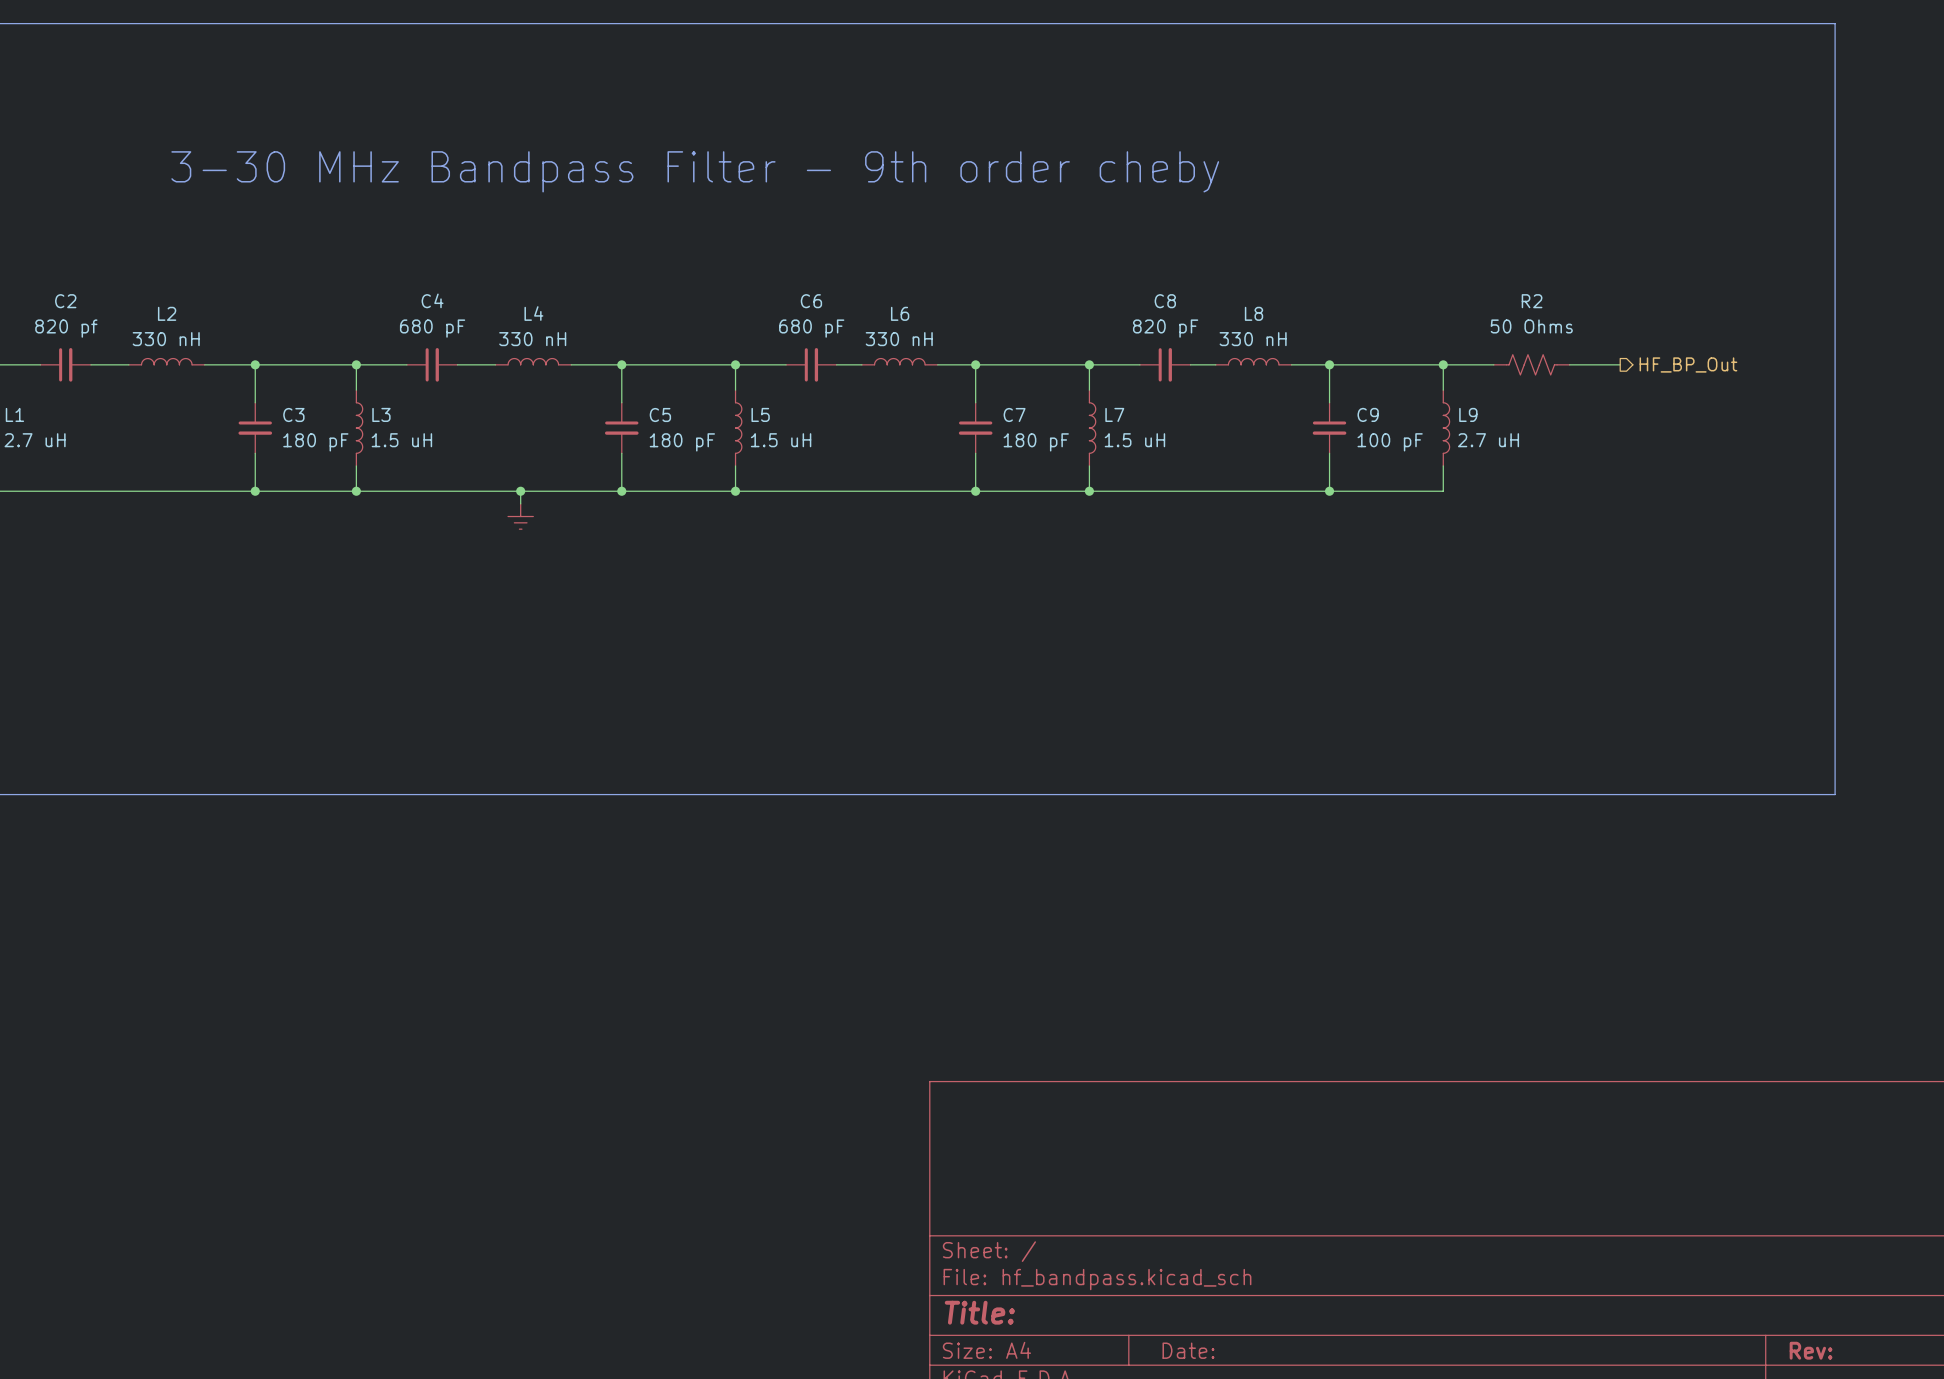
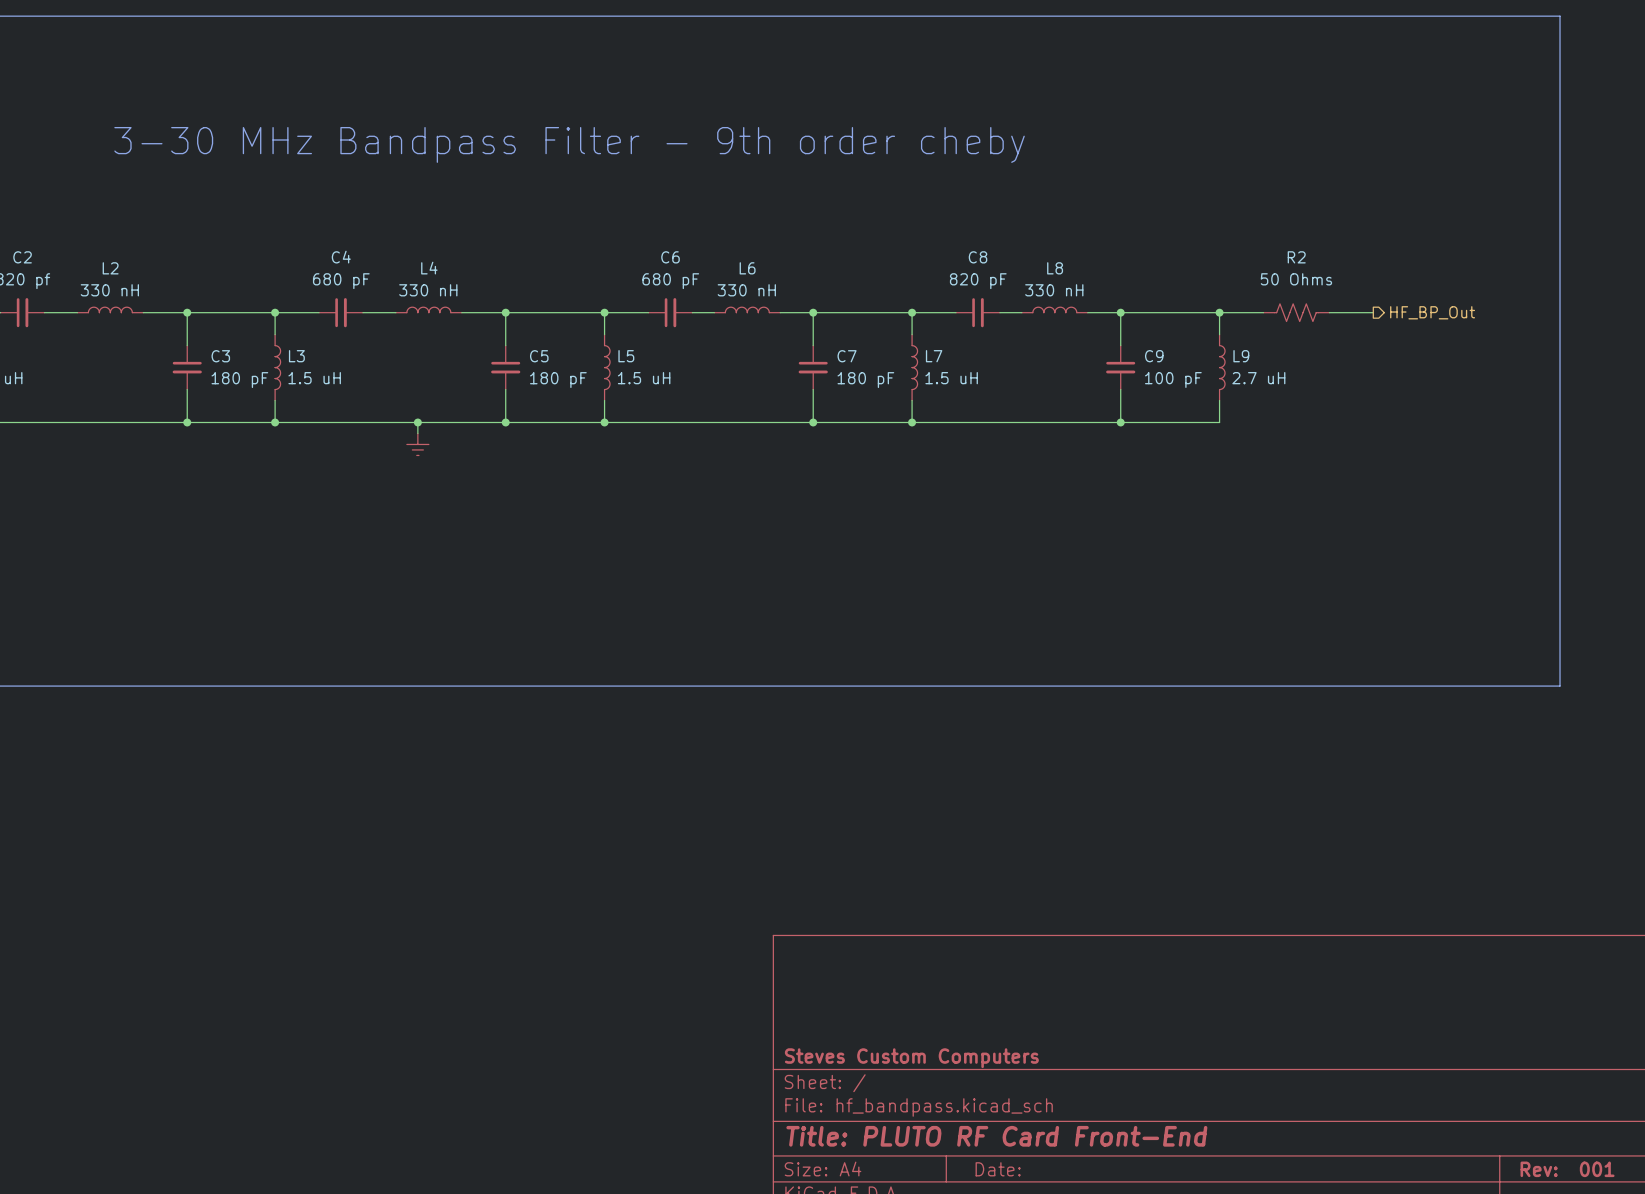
title block: none -> Steves Custom Computers (911, 1058)
title block: Title: (979, 1312) -> Title: PLUTO RF Card Front-End (996, 1136)
title block: Rev: (1811, 1350) -> Rev: 001 (1567, 1169)

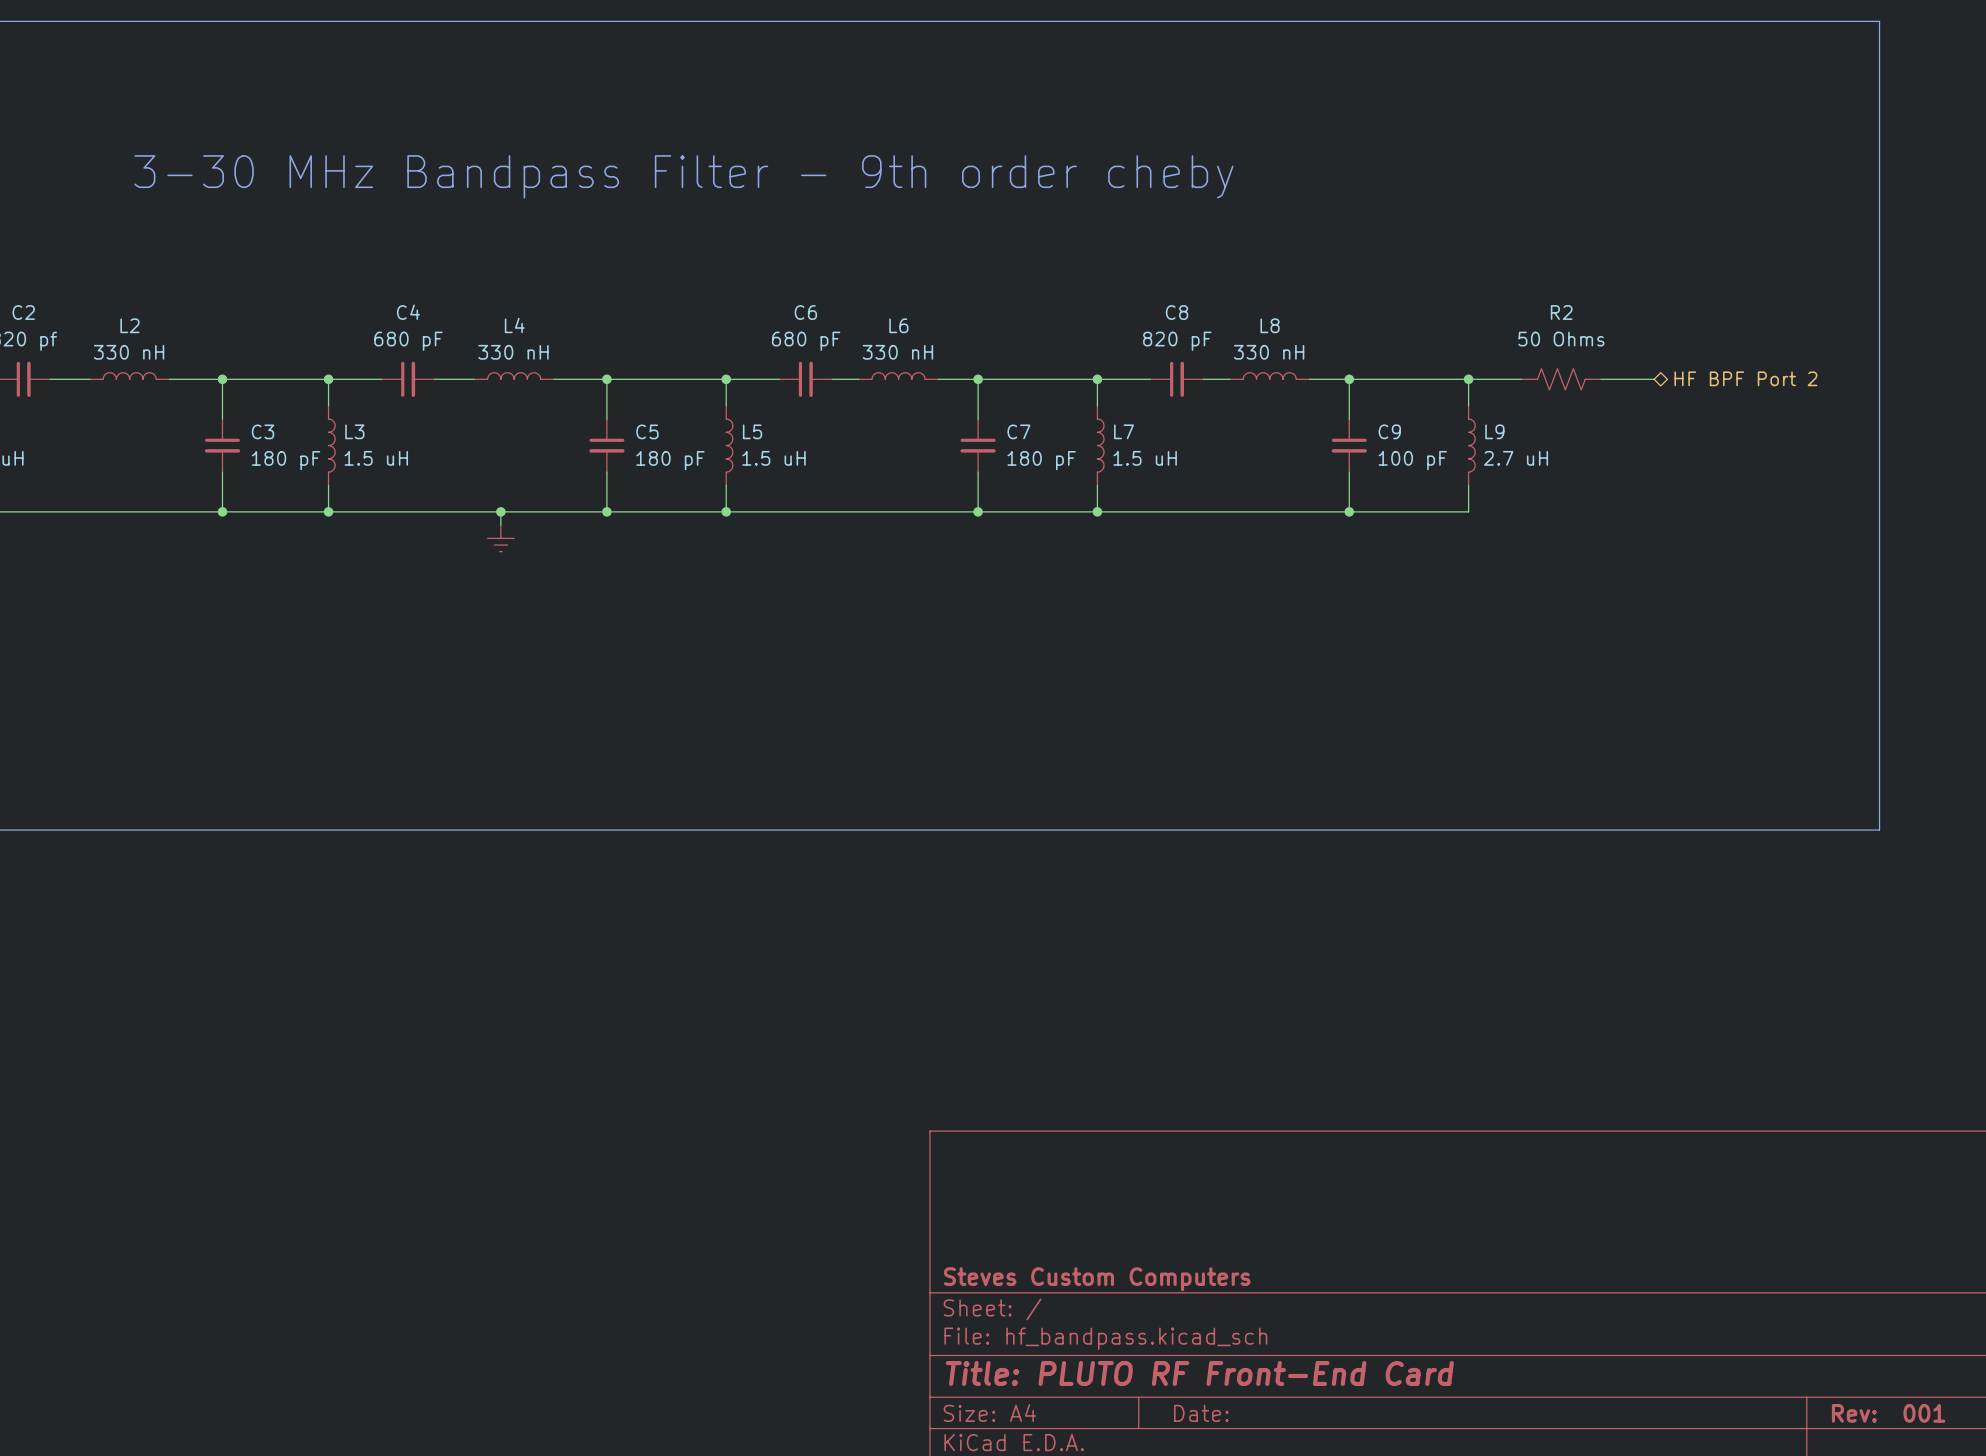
hierarchical label shape: output (1432, 312) -> bidirectional (1745, 378)
hierarchical label: HF_BP_Out (1432, 312) -> HF BPF Port 2 (1745, 378)
title block: Title: PLUTO RF Card Front-End (996, 1136) -> Title: PLUTO RF Front-End Card (1199, 1373)

